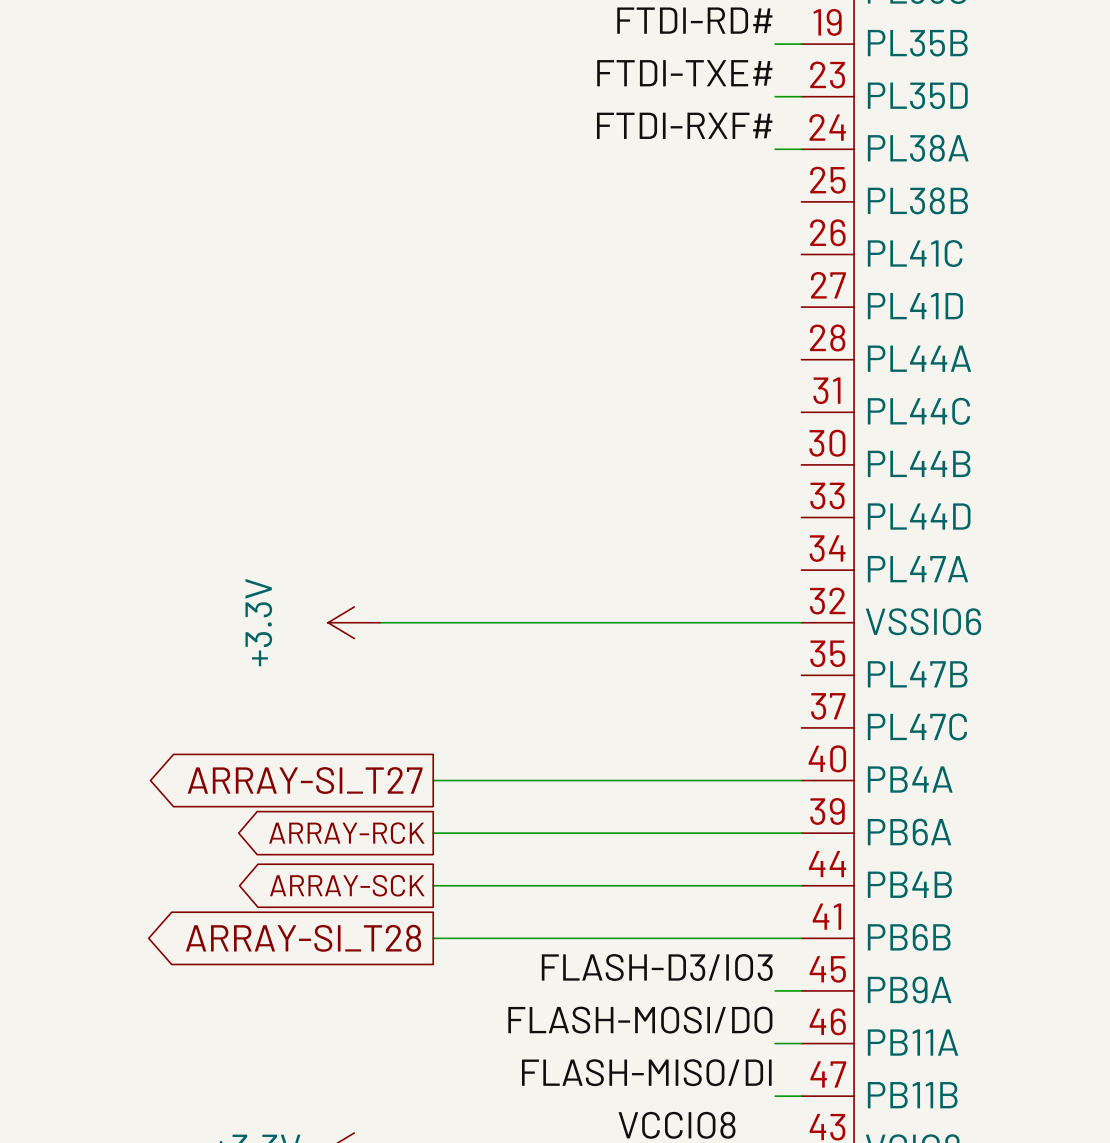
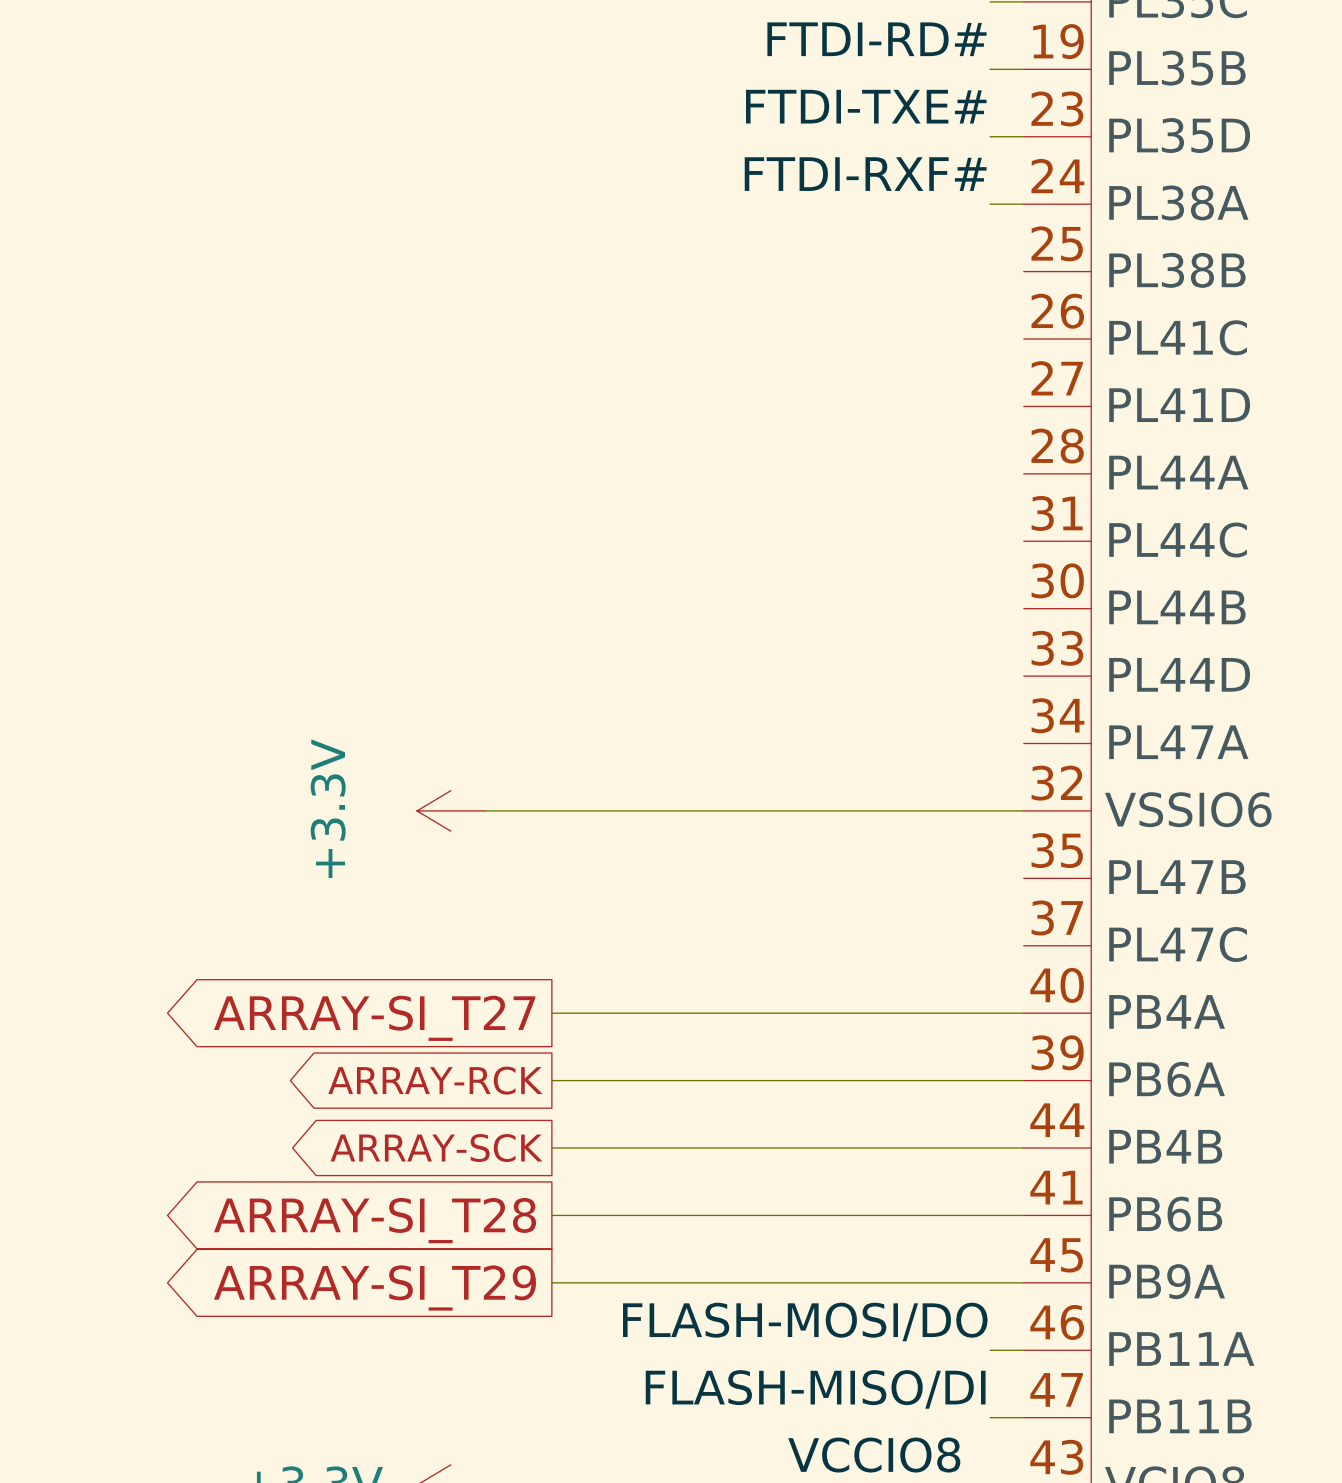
label: FLASH-D3/IO3 (657, 967) -> none
global label: none -> ARRAY-SI_T29 (374, 1287)
wire: none -> (551, 1282) (990, 1282)

